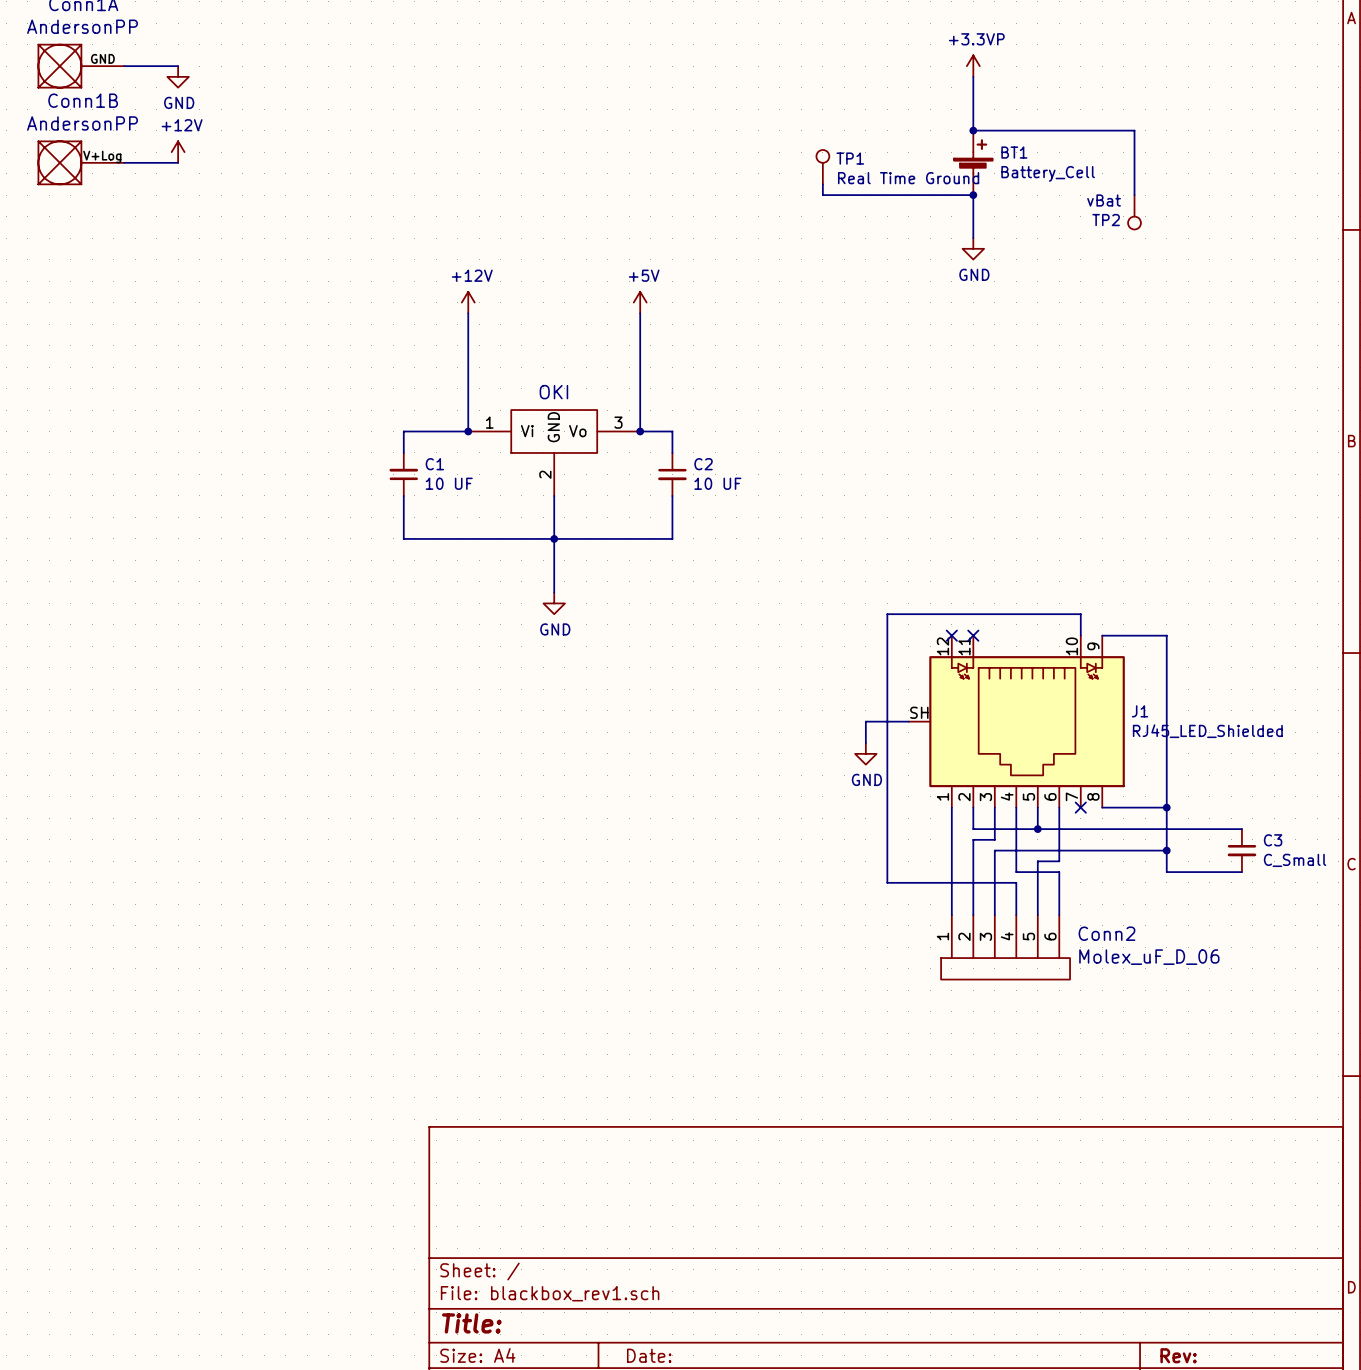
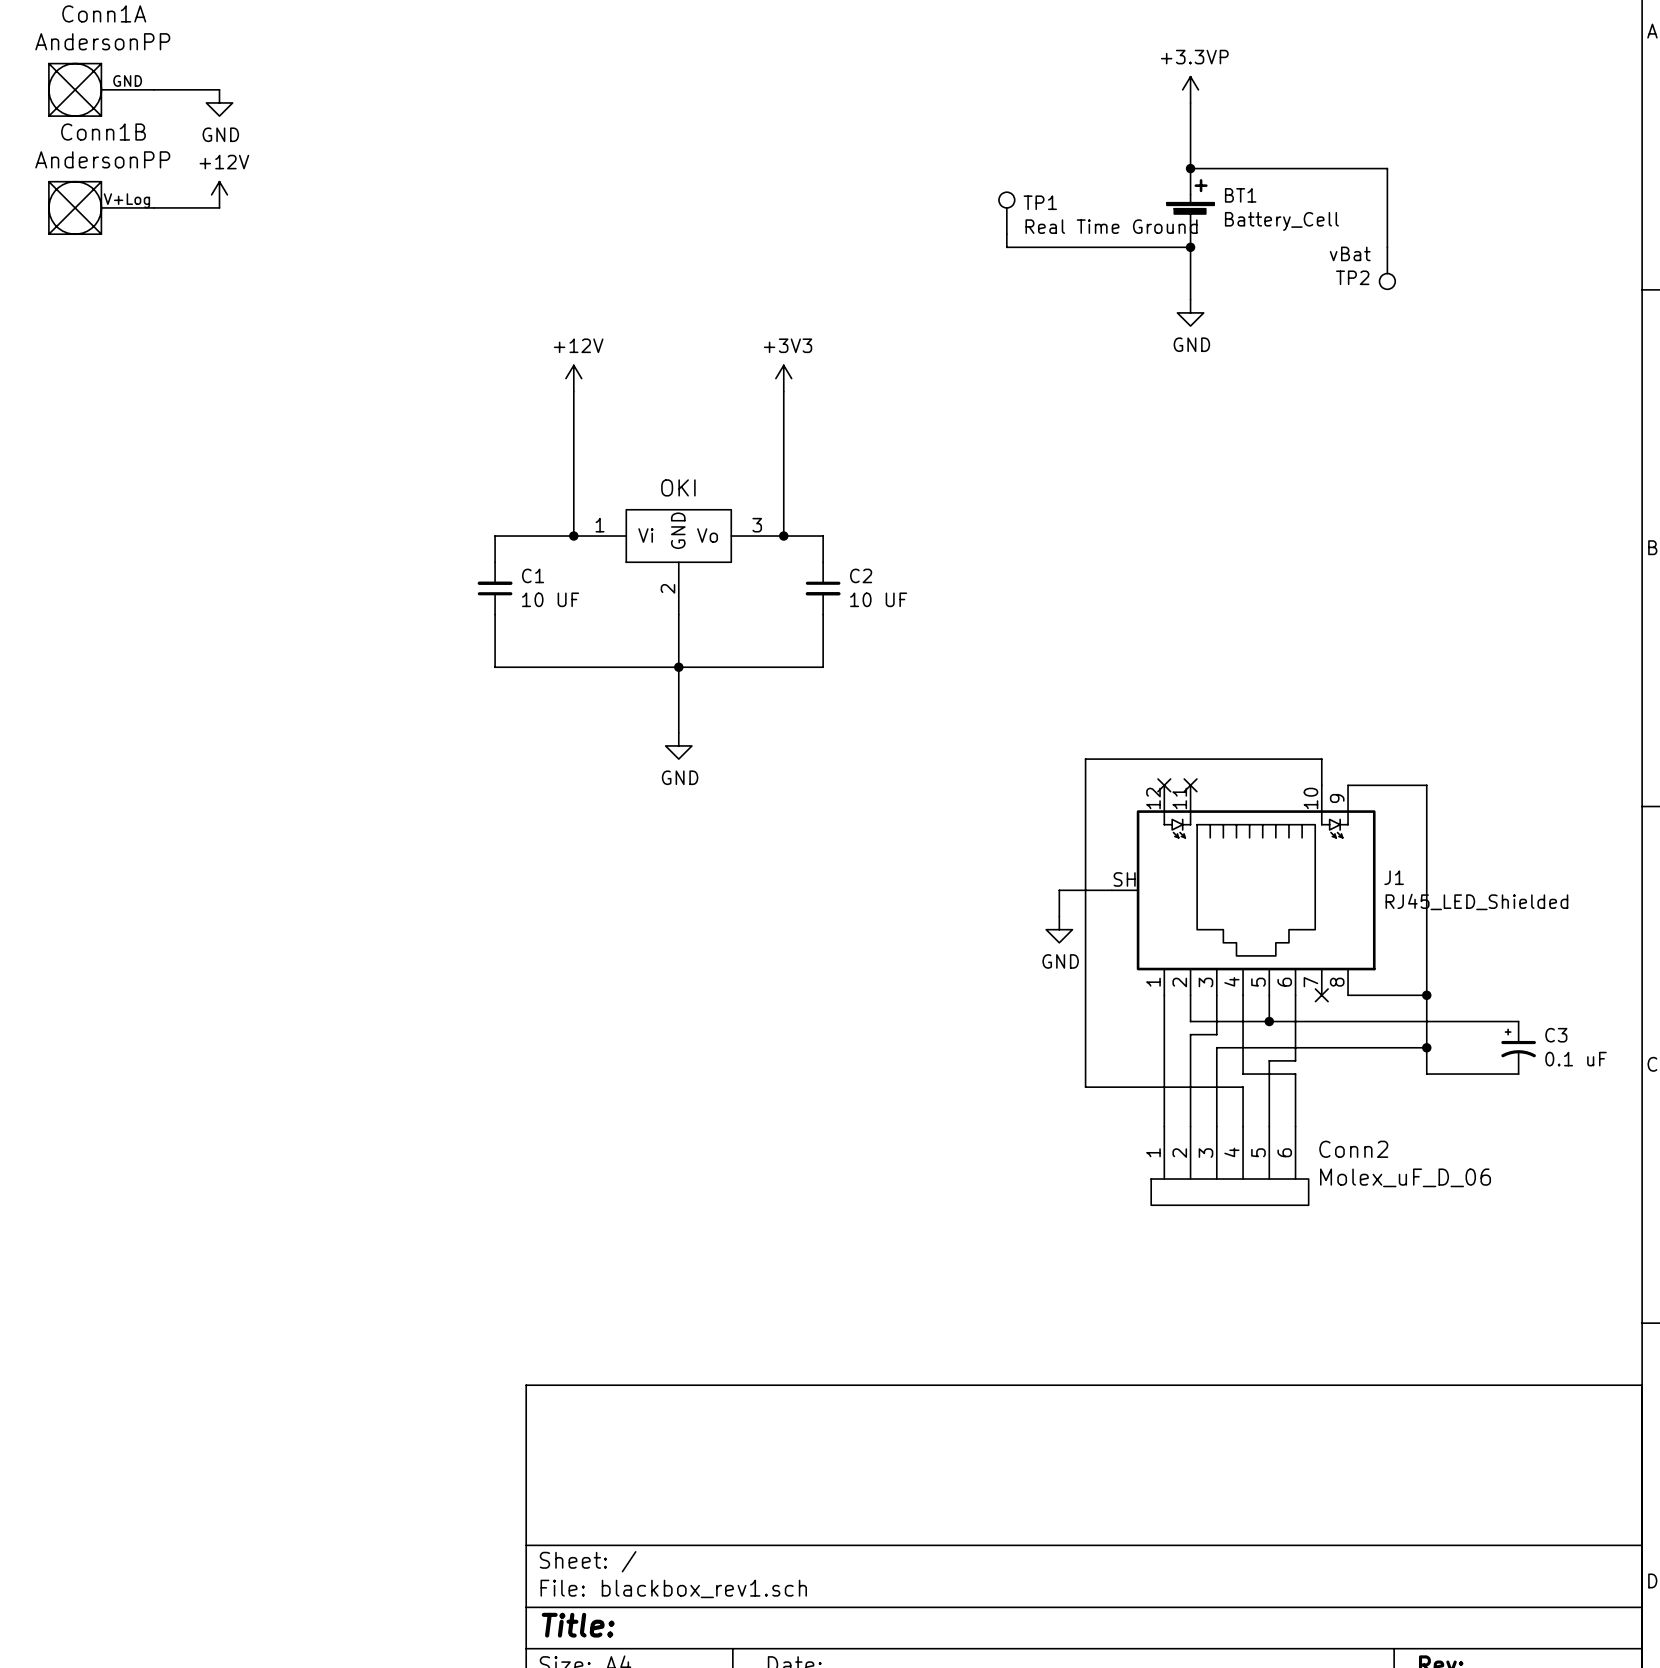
power symbol: +5V (640, 302) -> +3V3 (783, 378)
C3 symbol: [1227, 829, 1257, 873] -> [1501, 1021, 1536, 1075]
C3 value: C_Small (1295, 860) -> 0.1 uF (1576, 1059)

